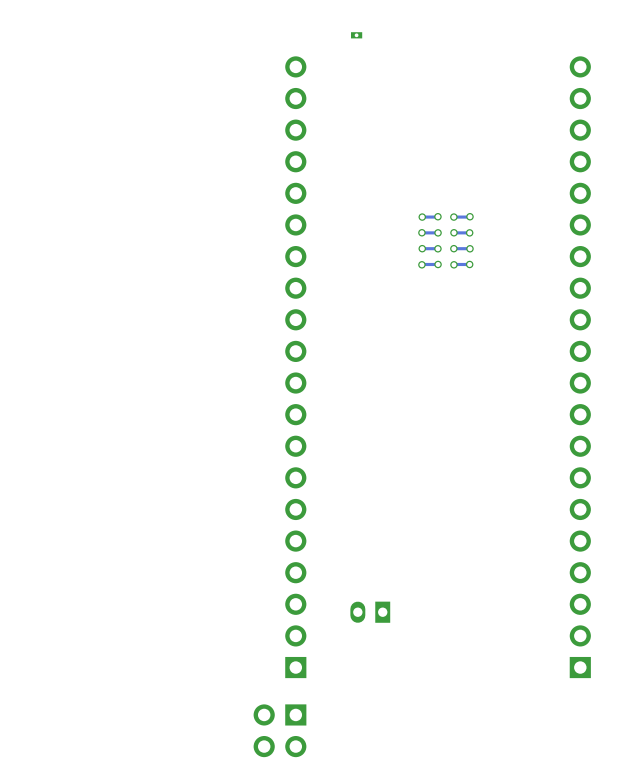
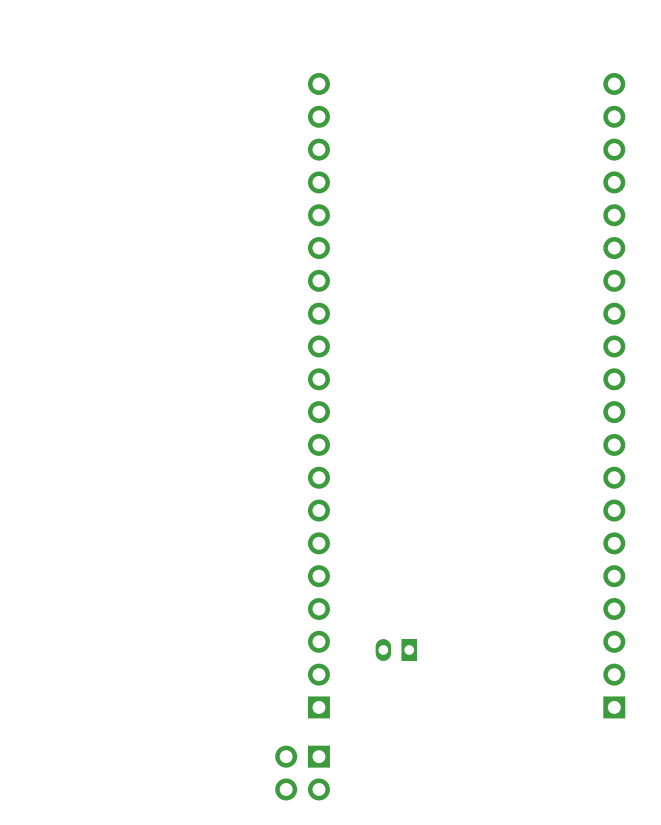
part: (356, 35) -> none
track: (437, 216) (422, 217) -> none
via: (437, 216) -> none
track: (469, 216) (453, 217) -> none
via: (469, 216) -> none
via: (422, 217) -> none
via: (453, 217) -> none
via: (421, 232) -> none
track: (438, 232) (422, 232) -> none
via: (438, 232) -> none
via: (453, 232) -> none
track: (469, 232) (454, 232) -> none
via: (469, 232) -> none
via: (422, 248) -> none
track: (437, 248) (422, 248) -> none
via: (437, 248) -> none
via: (453, 248) -> none
track: (469, 248) (453, 248) -> none
via: (469, 248) -> none
via: (421, 264) -> none
track: (438, 264) (421, 264) -> none
via: (438, 264) -> none
via: (453, 264) -> none
track: (469, 264) (453, 264) -> none
via: (469, 264) -> none

